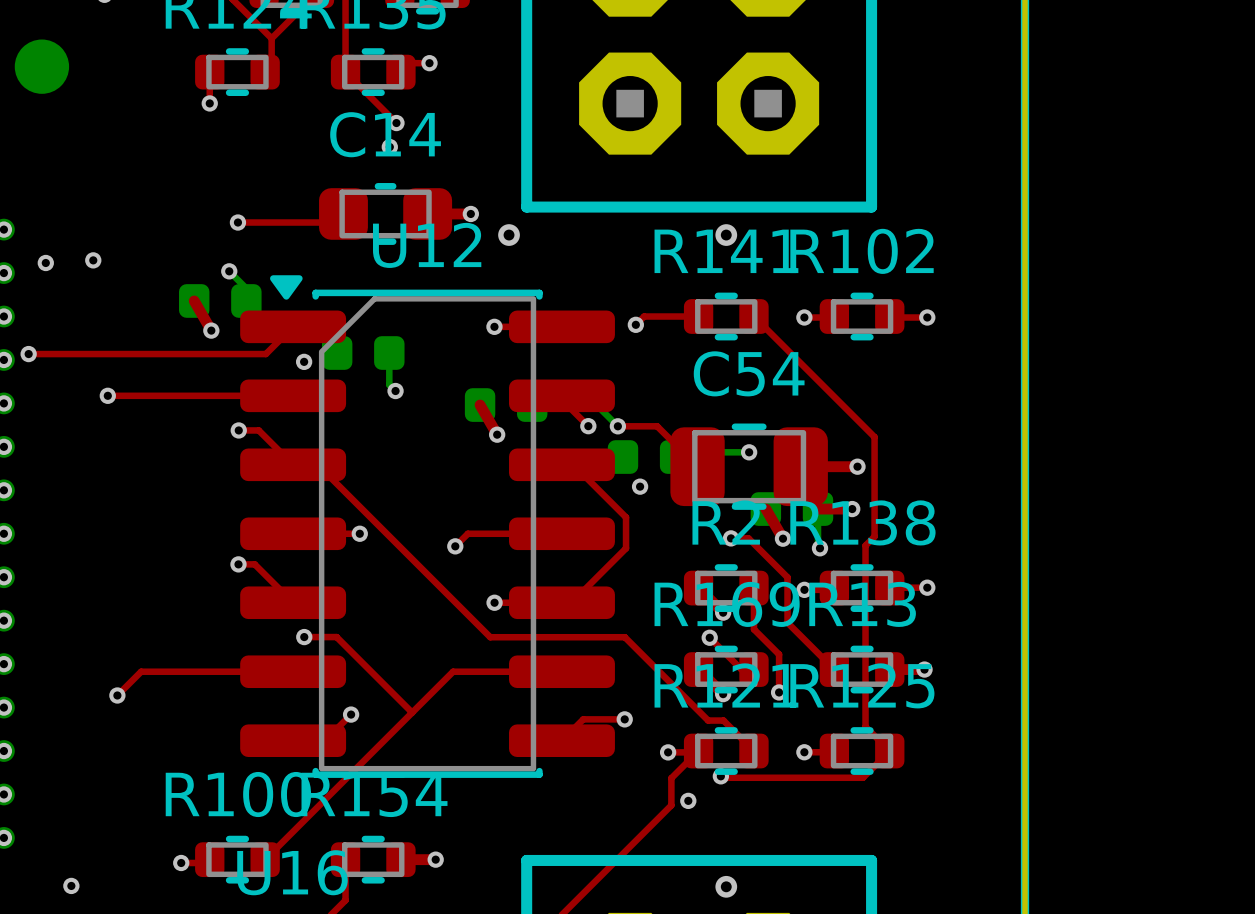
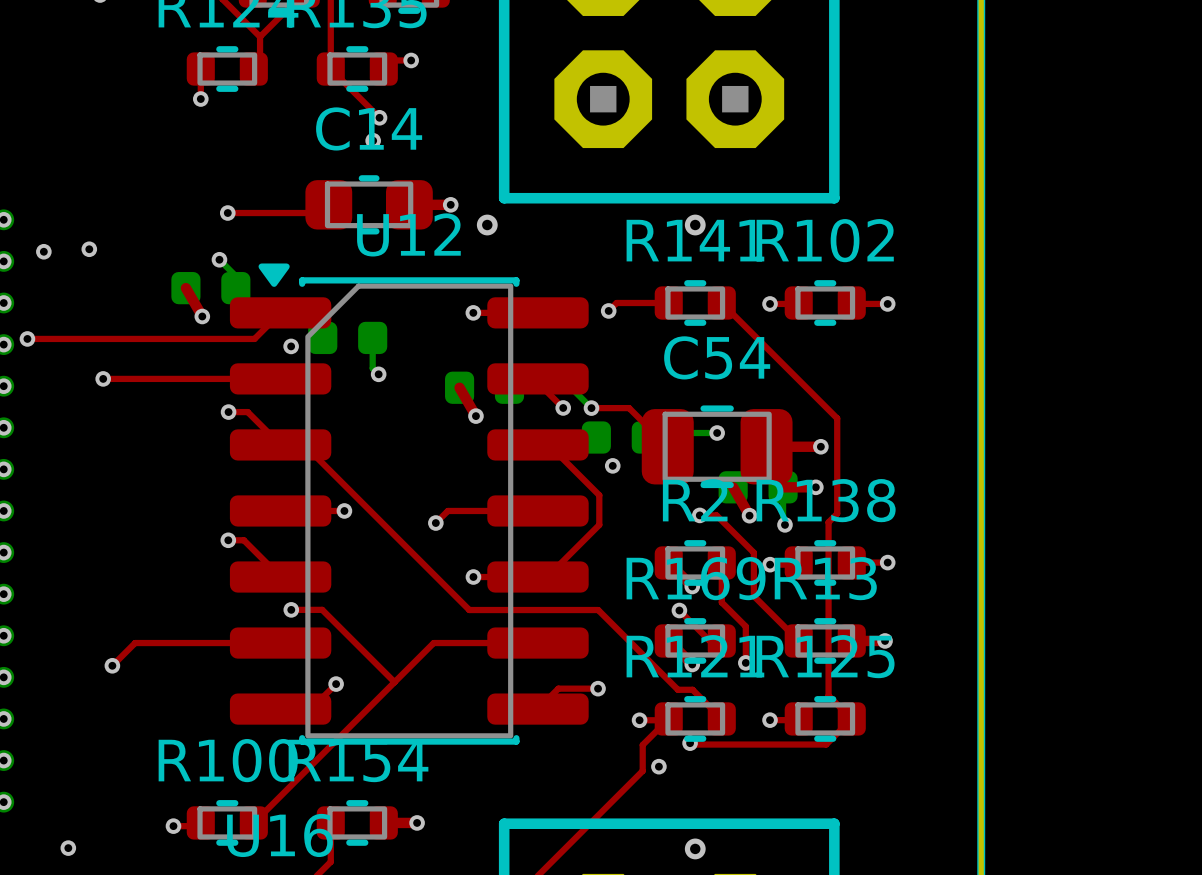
part: (41, 66) -> none

